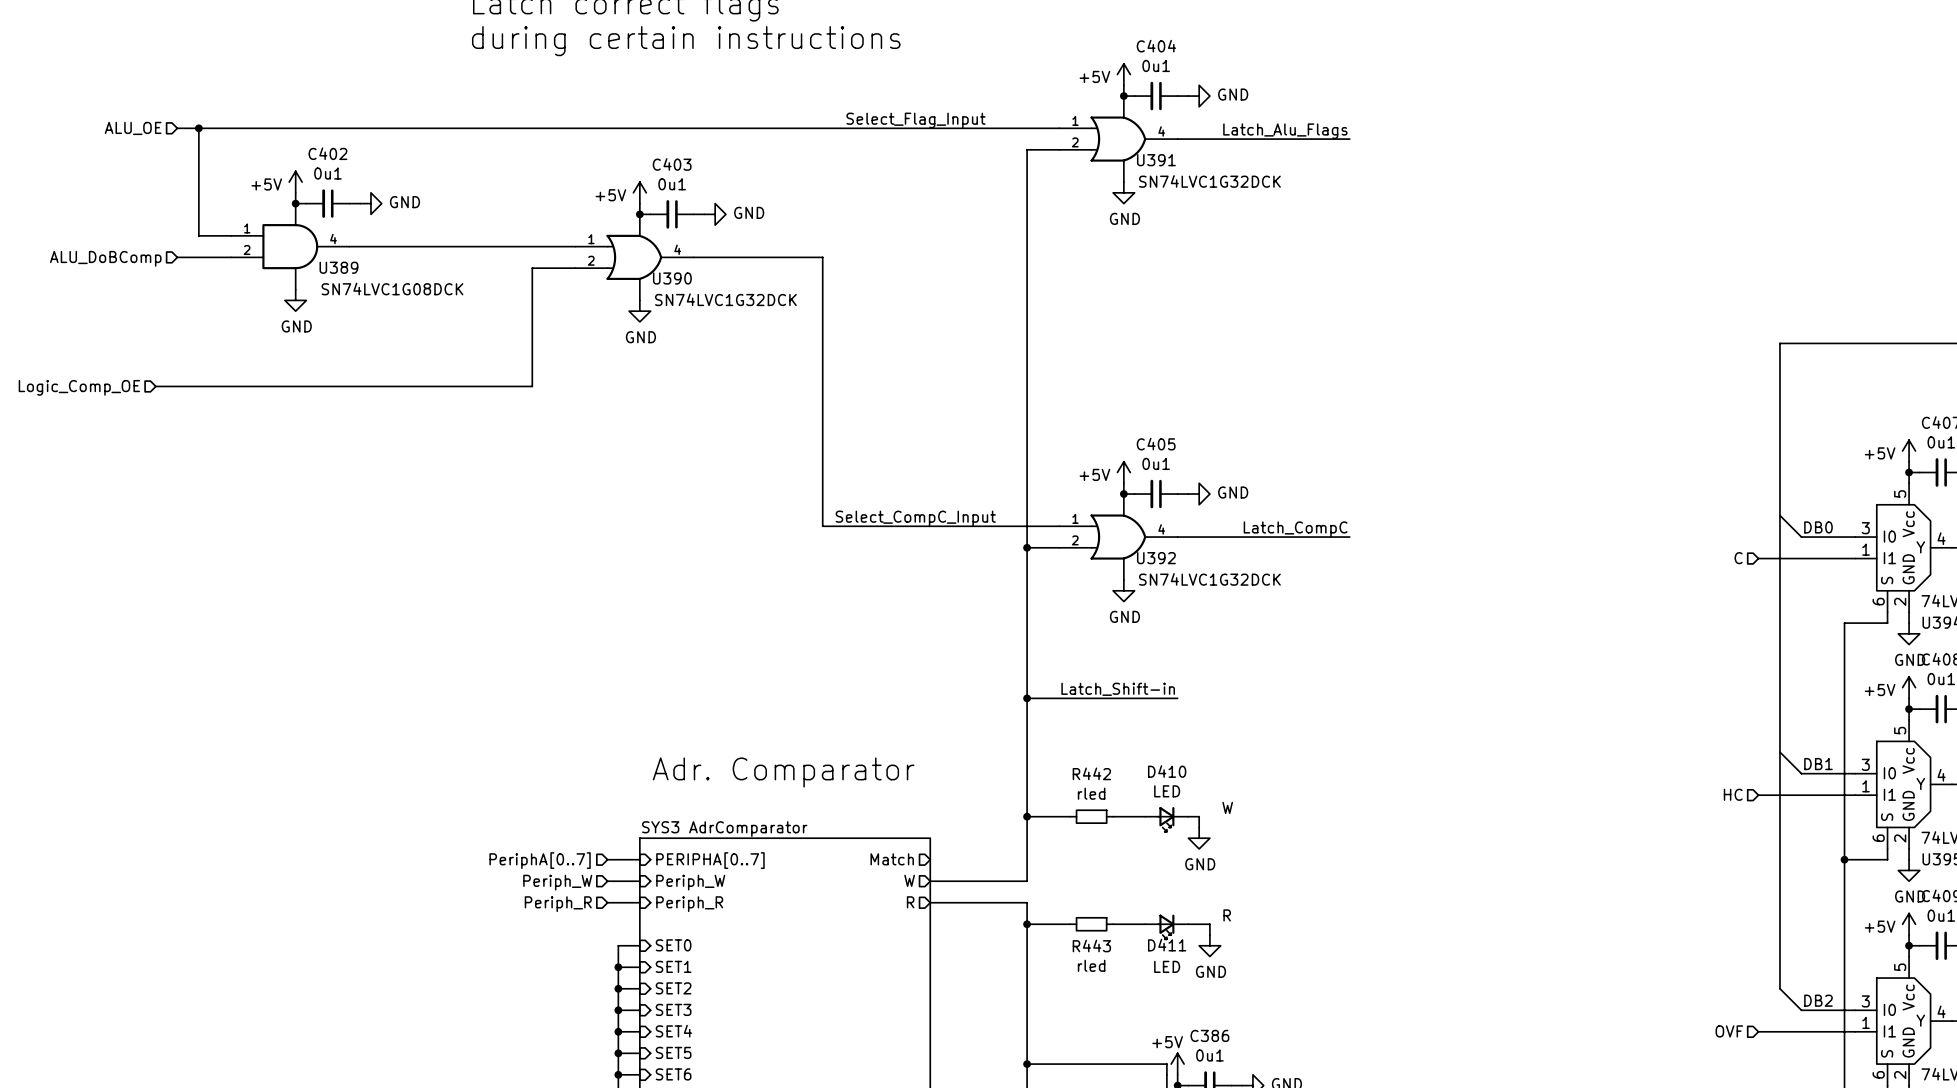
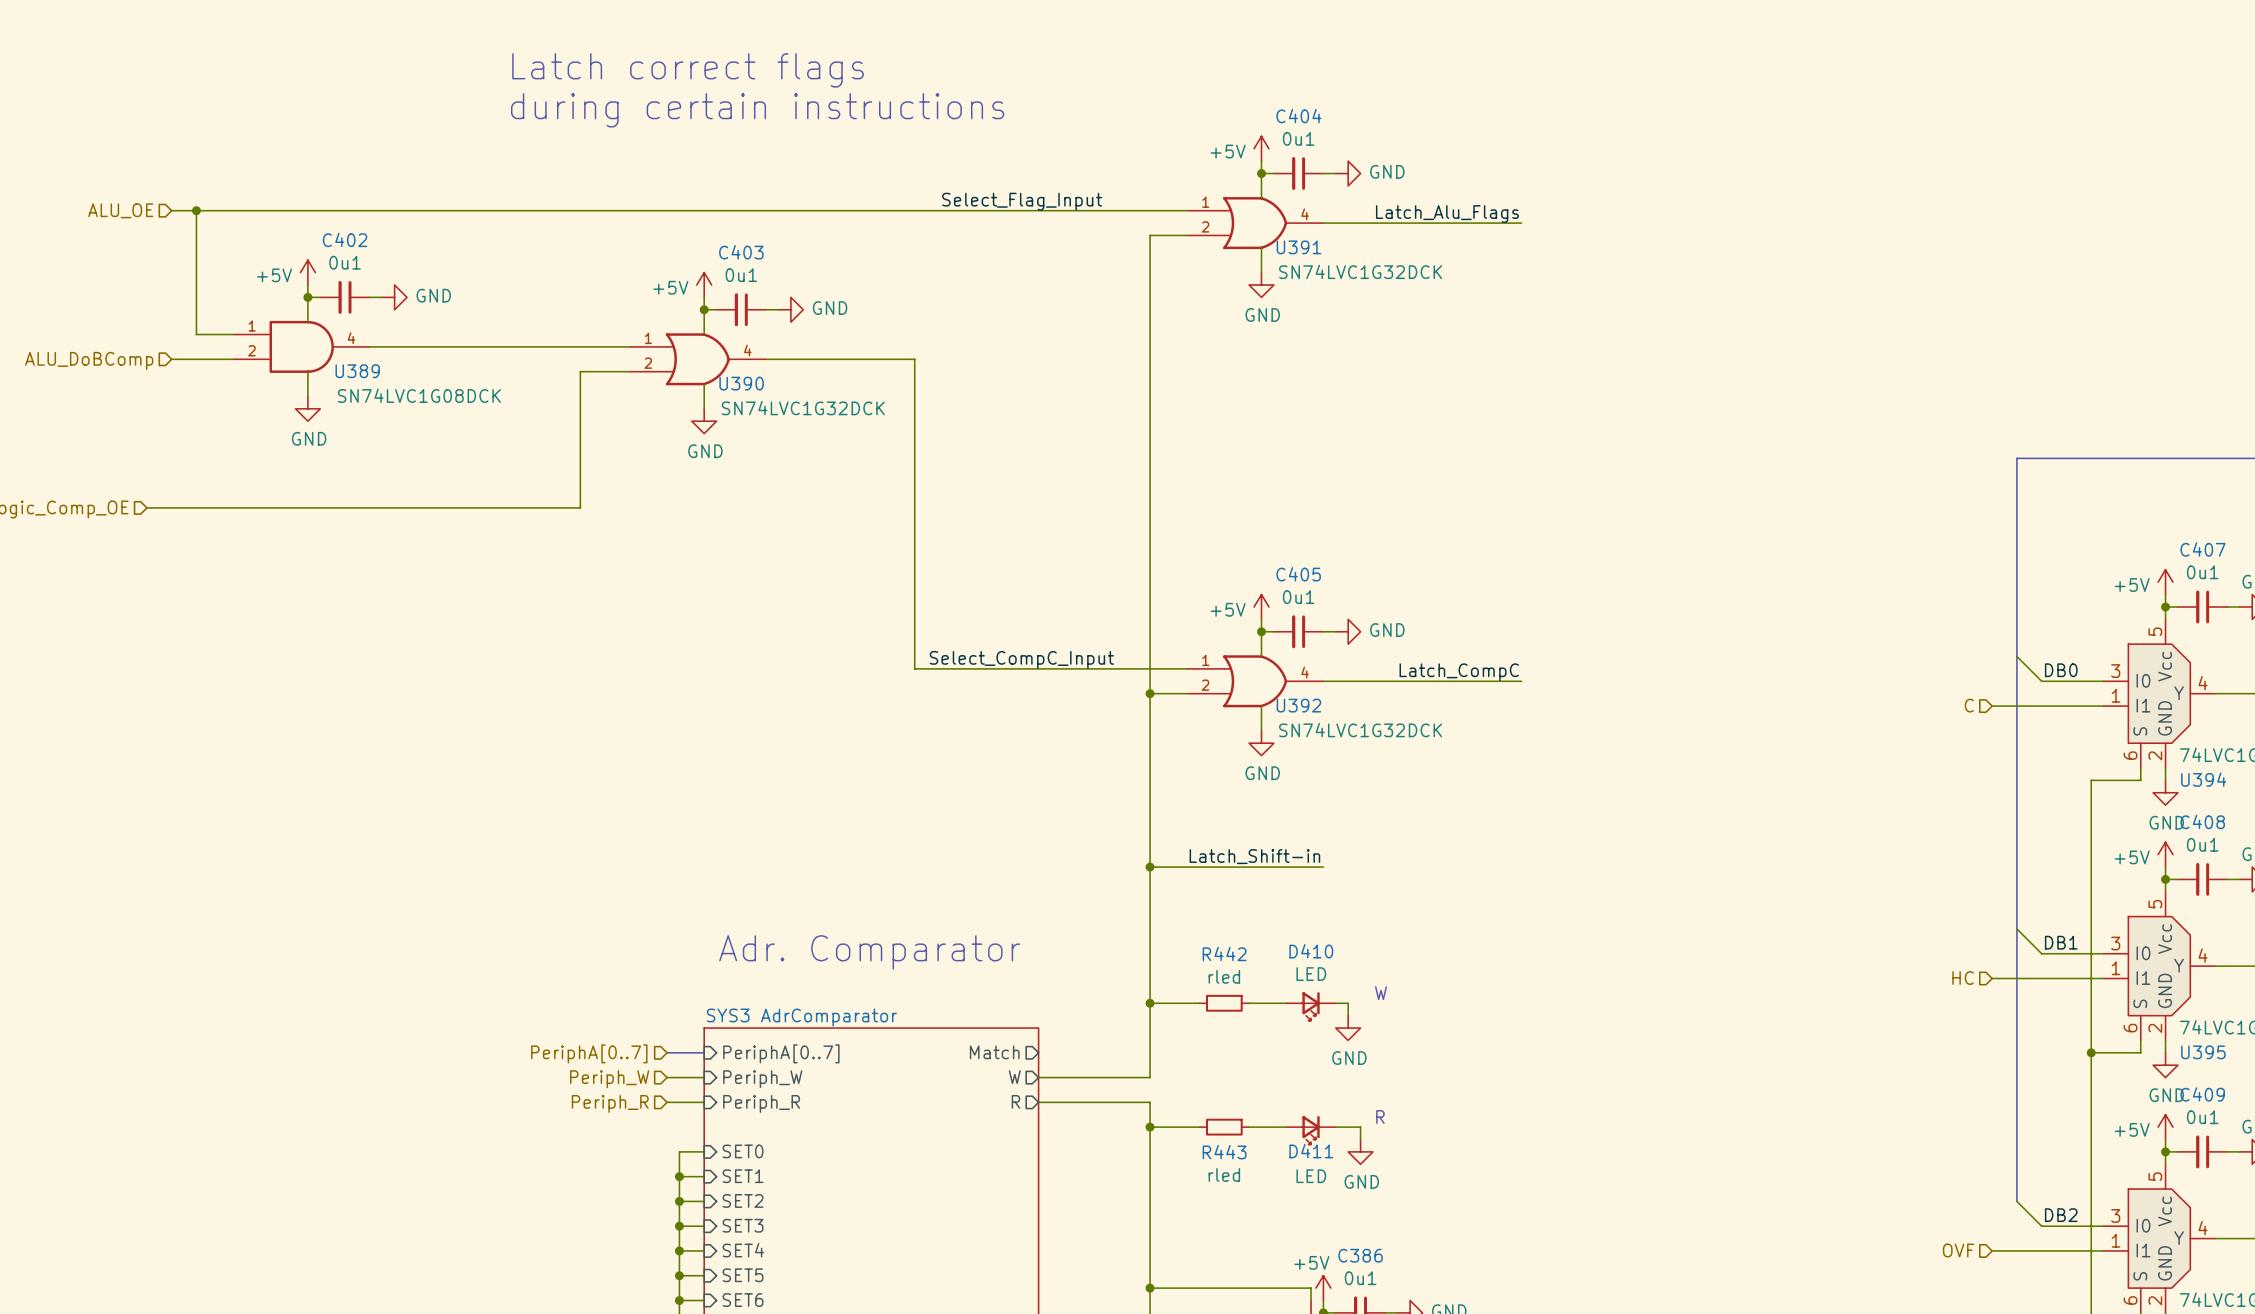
sheet pin: PERIPHA[0..7] (710, 860) -> PeriphA[0..7] (781, 1053)

